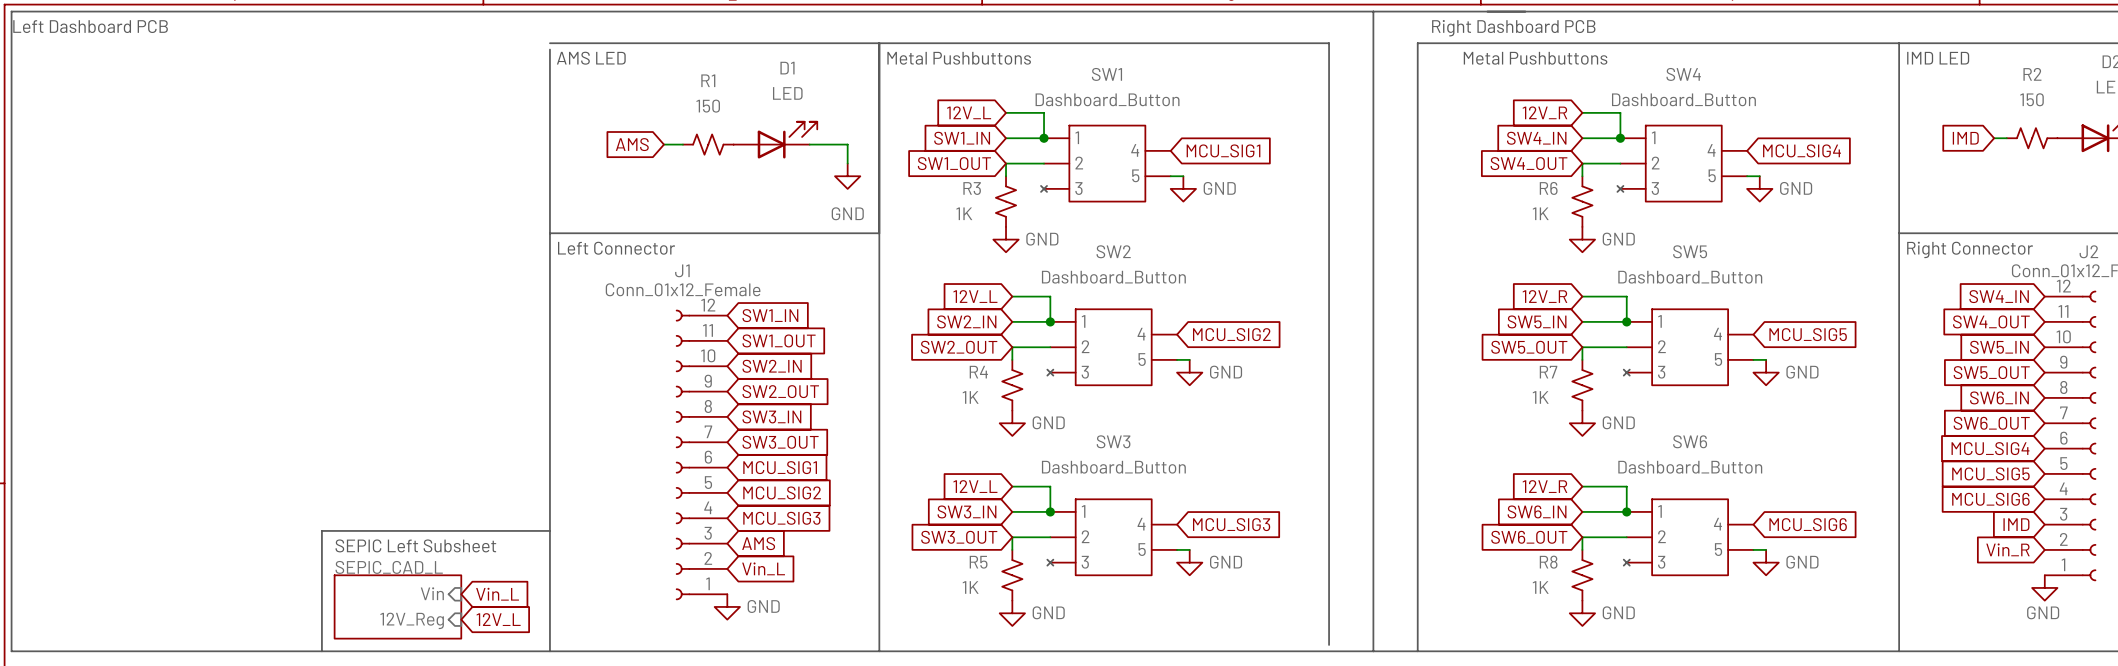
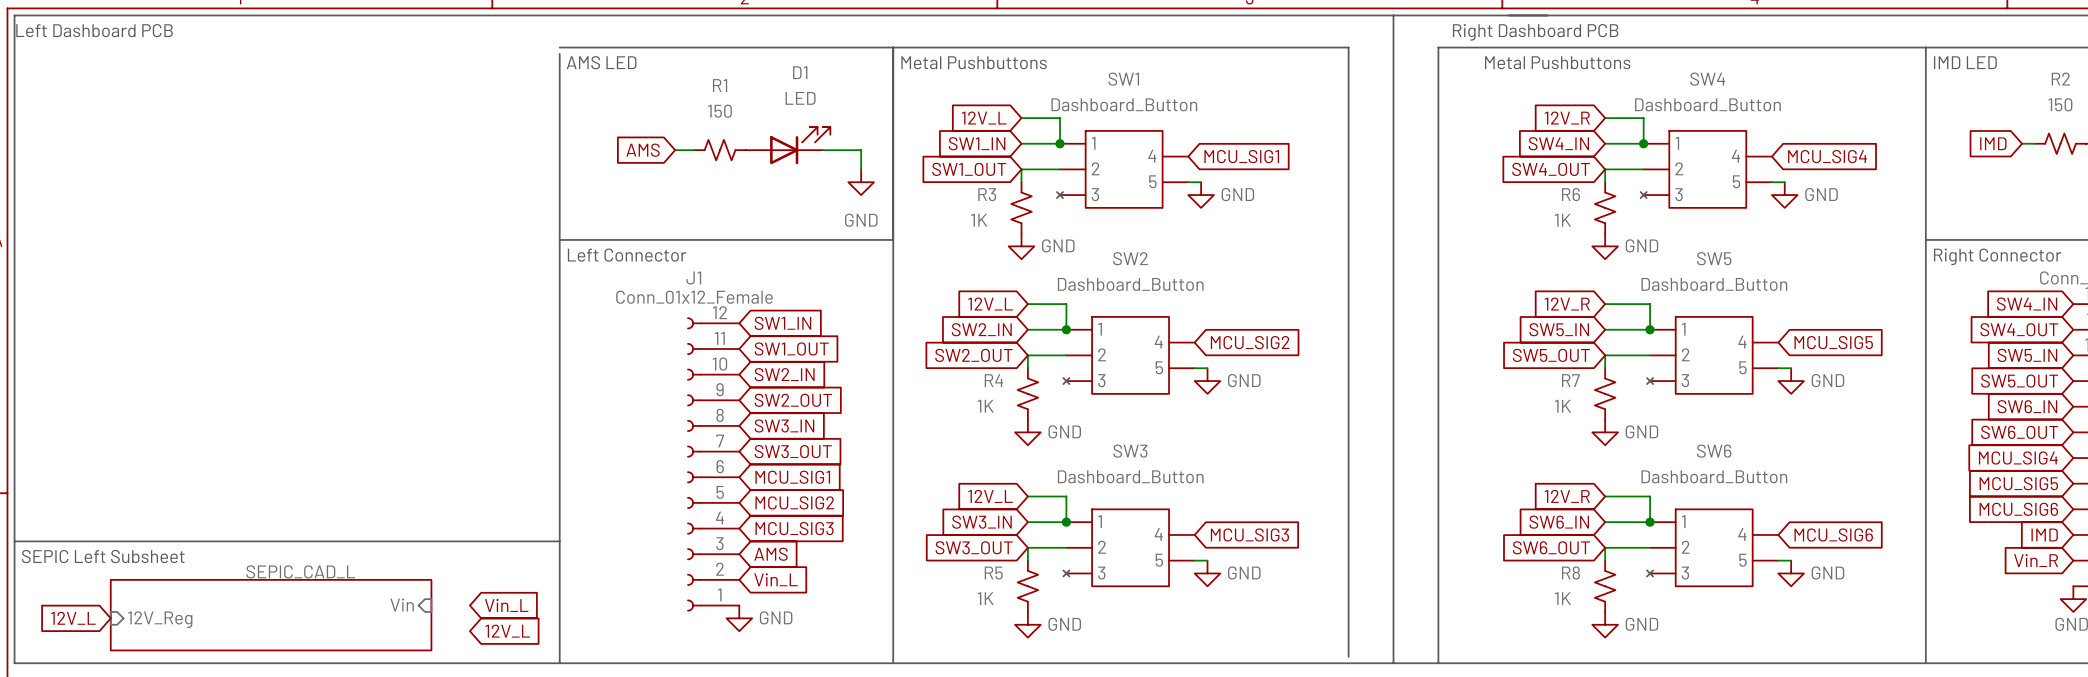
line: (321, 530) (321, 651) -> (328, 541) (14, 541)
text: none -> SEPIC Left Subsheet (103, 556)
text: SEPIC Left Subsheet (415, 545) -> none
sheet pin position: Vin (432, 593) -> Vin (402, 604)
sheet SEPIC_CAD_L: none -> (271, 615)
global label: none -> 12V_L (73, 618)
sheet SEPIC_CAD_L: (397, 606) -> none
sheet pin: none -> 12V_Reg (160, 619)
sheet pin: 12V_Reg (412, 620) -> none

